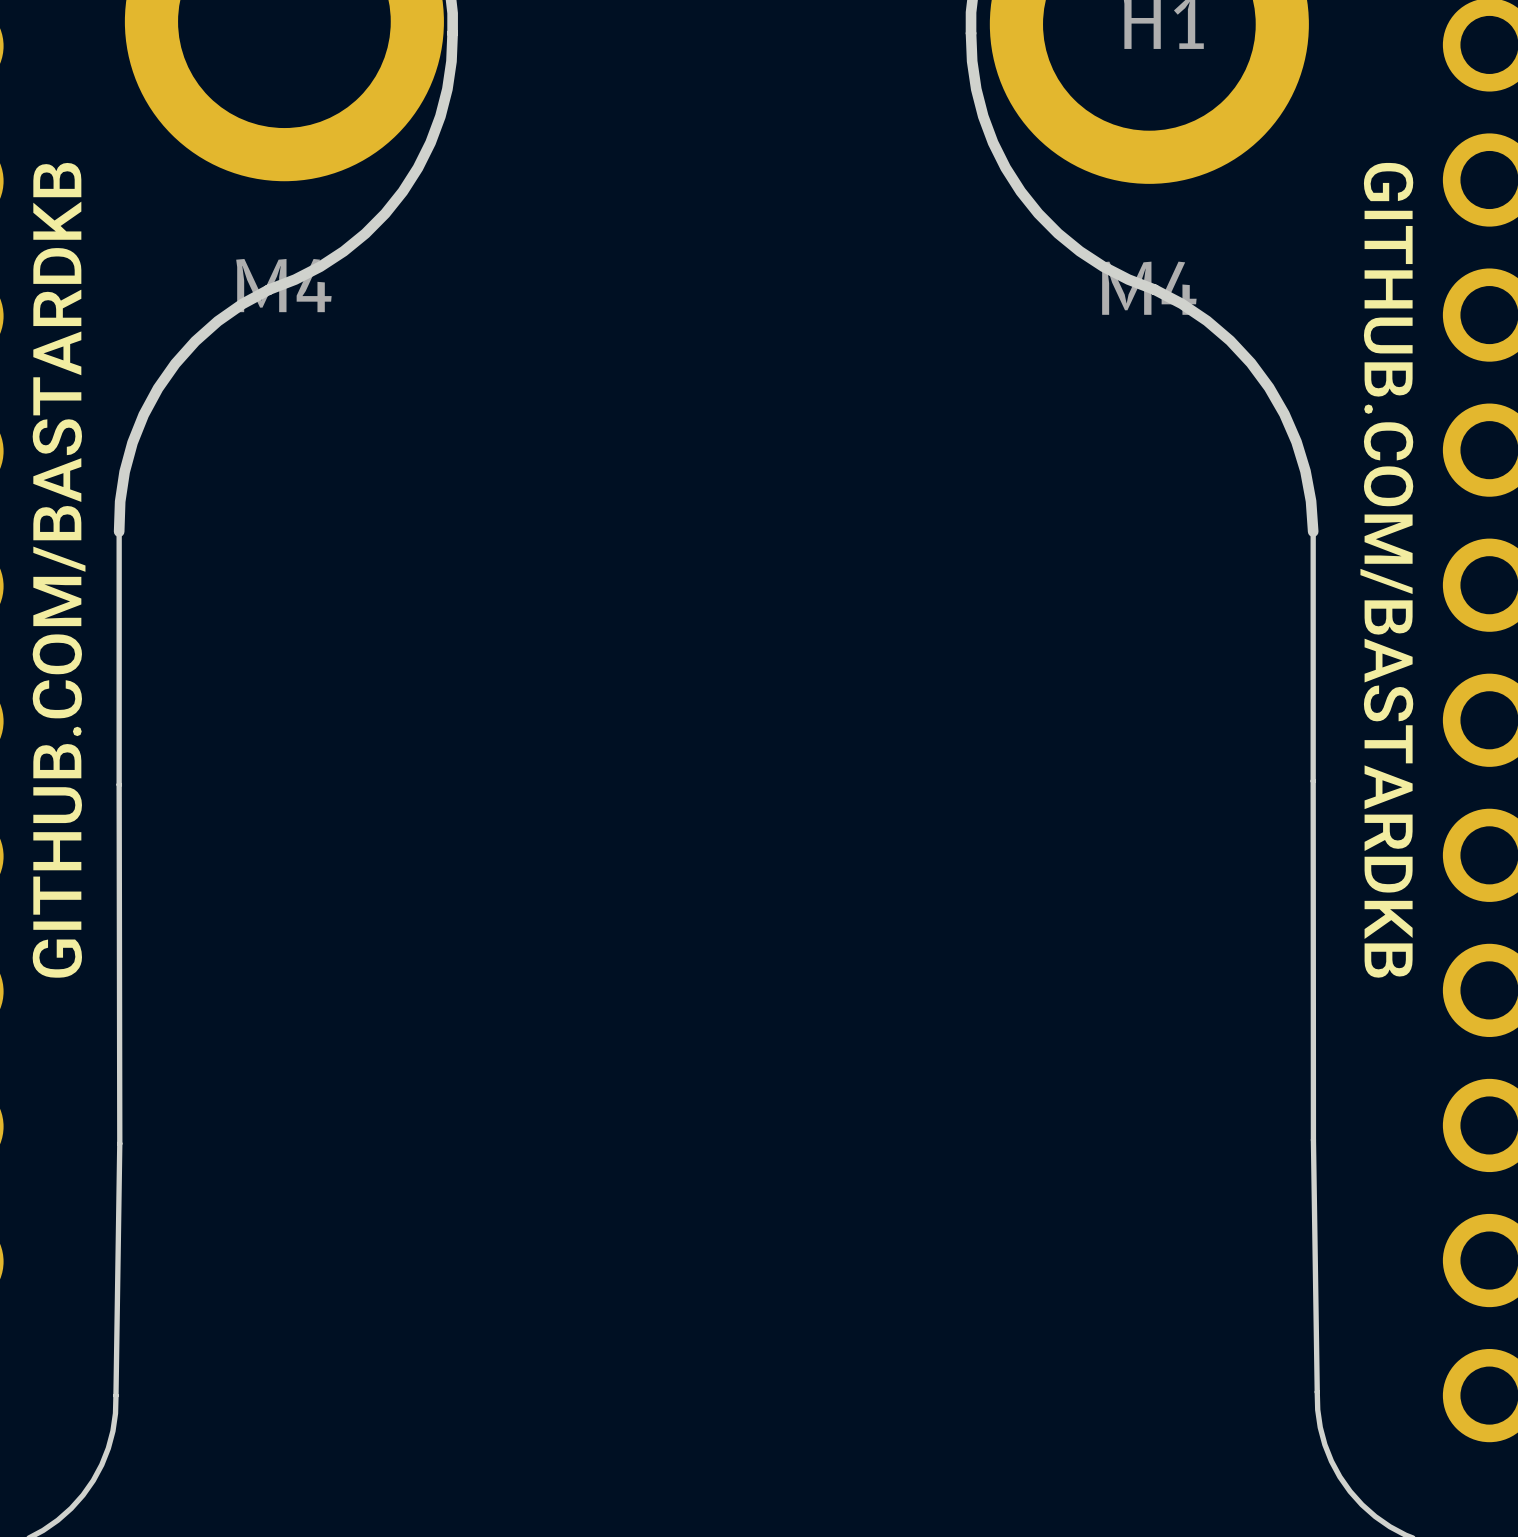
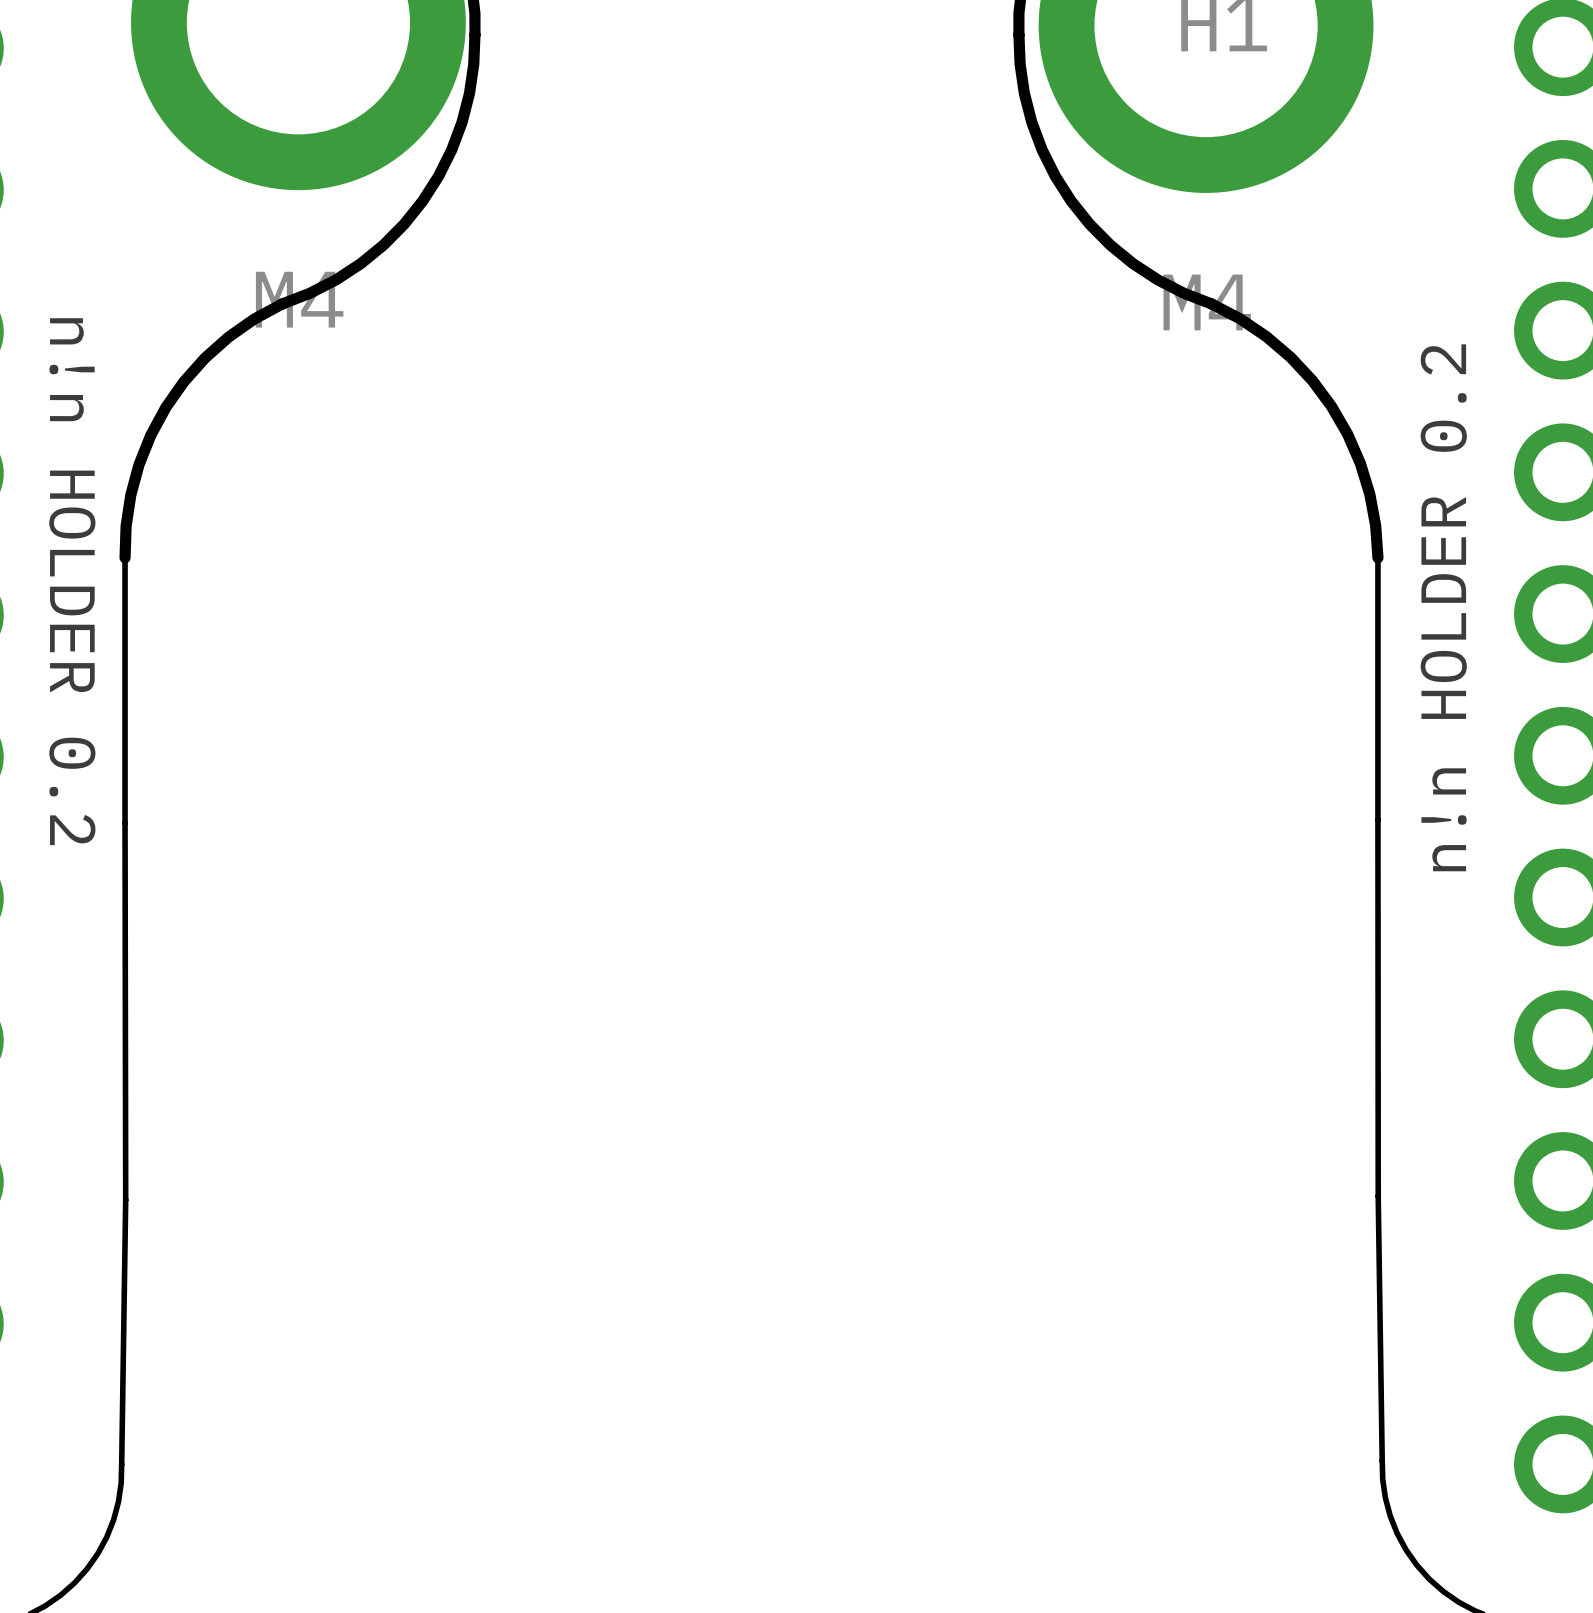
drawing: [32, 162, 86, 978] -> none
drawing: [1360, 162, 1414, 978] -> none
text: none -> n!n HOLDER 0.2 (72, 581)
text: none -> n!n HOLDER 0.2 (1443, 607)

